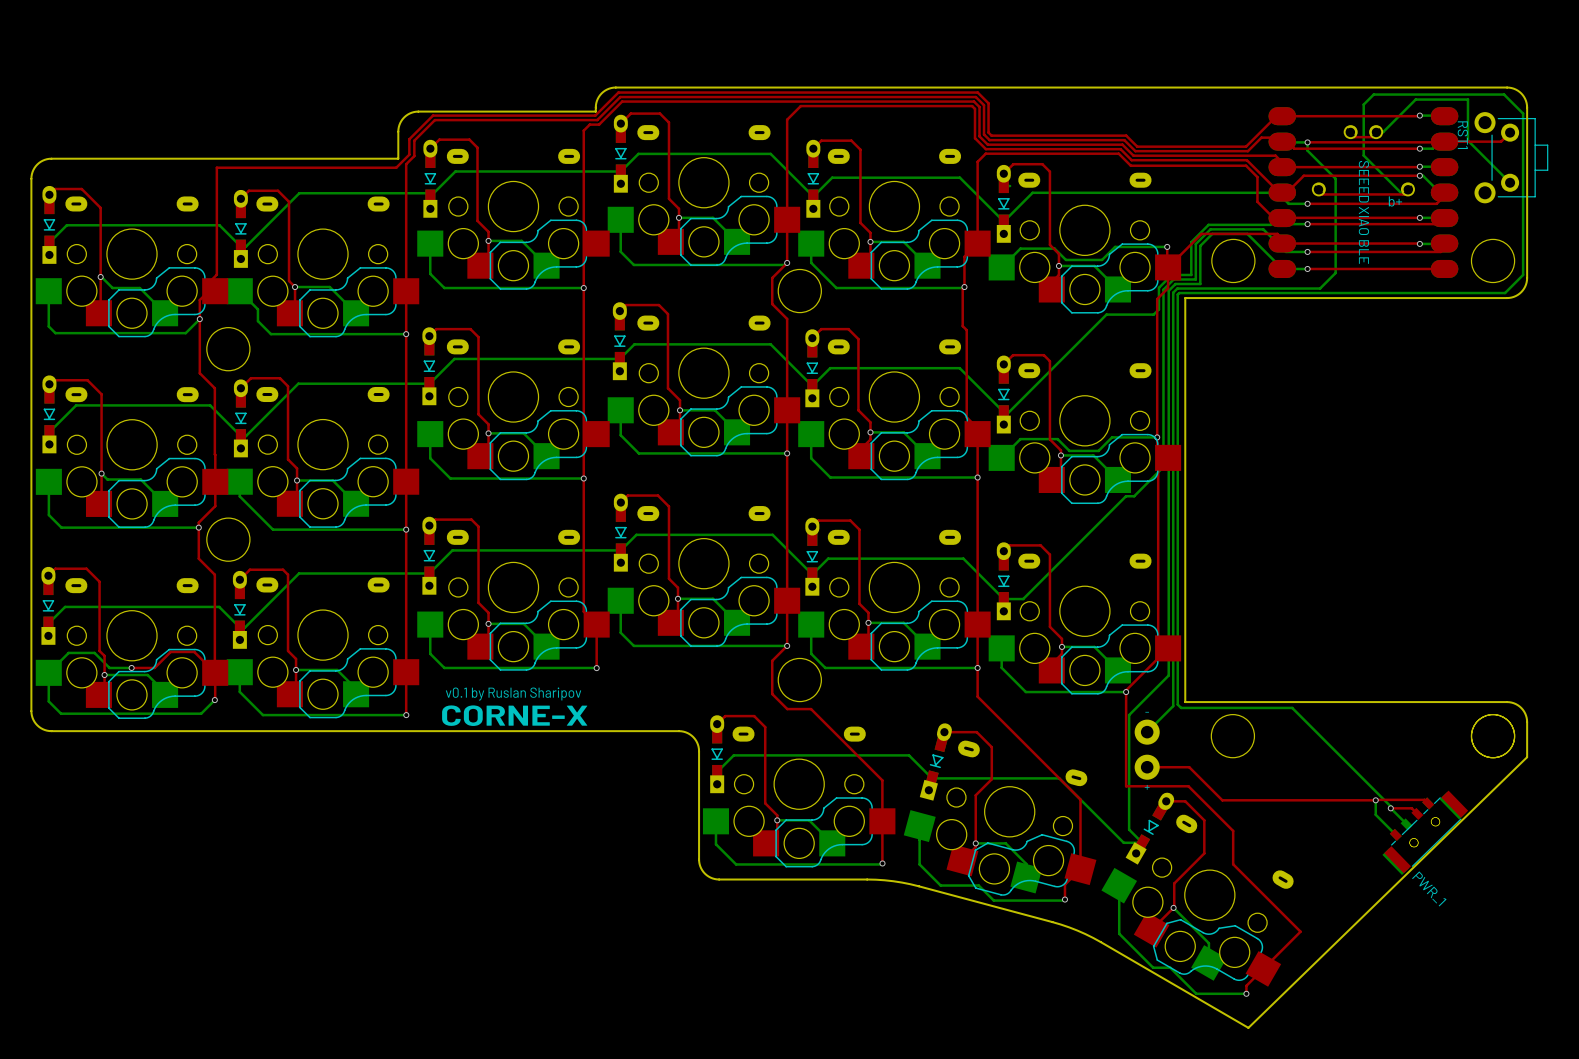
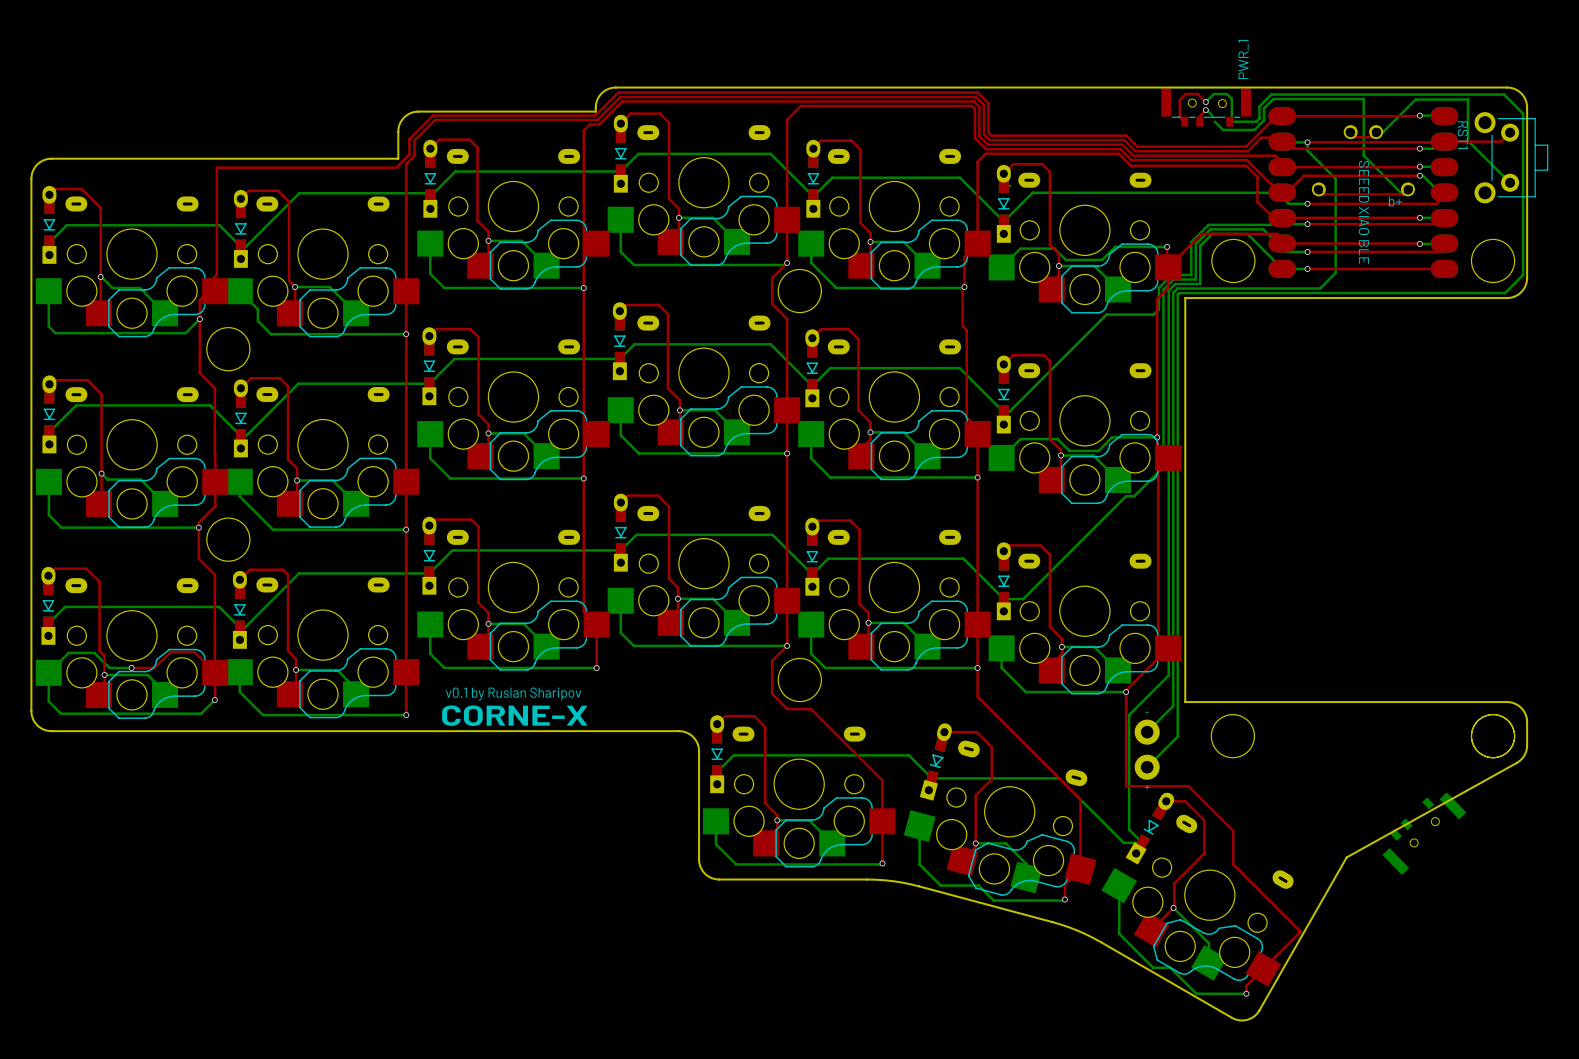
bottom track: (1373, 94) (1363, 104) -> (1373, 94) (1271, 94) (1259, 106) (1259, 118) (1256, 121) (1229, 121) (1231, 119) (1231, 99) (1226, 94) (1213, 94) (1205, 102)
top track: none -> (1205, 102) (1197, 94) (1185, 94) (1179, 100) (1179, 117) (1184, 122)
via: none -> (1205, 102)
bottom track: none -> (1363, 104) (1363, 99) (1273, 99) (1263, 108) (1263, 120) (1254, 129) (1223, 129) (1214, 121)
top track: none -> (1205, 110) (1199, 116) (1199, 122)
via: none -> (1205, 110)
bottom track: none -> (1206, 110) (1212, 115)
bottom track: (1177, 704) (1181, 707) (1292, 707) (1406, 824) -> (1177, 704) (1177, 736) (1147, 767)
board edge: (1527, 745) (1527, 757) (1248, 1027) (1100, 942) -> (1527, 745) (1524, 755) (1516, 762) (1346, 857) (1259, 1010) (1251, 1018) (1240, 1020) (1232, 1017) (1100, 942)
top track: (1147, 767) (1189, 767) (1222, 800) (1424, 799) (1428, 803) -> none
bottom track: (1375, 800) (1375, 814) (1395, 834) -> none
via: (1375, 800) -> none
top track: (1390, 808) (1411, 808) (1417, 813) -> none
via: (1390, 808) -> none
PWR_1 rotation: 0° (1426, 831) -> 135.8° counterclockwise (1206, 106)
PWR_1 position: (1426, 831) -> (1206, 106)

